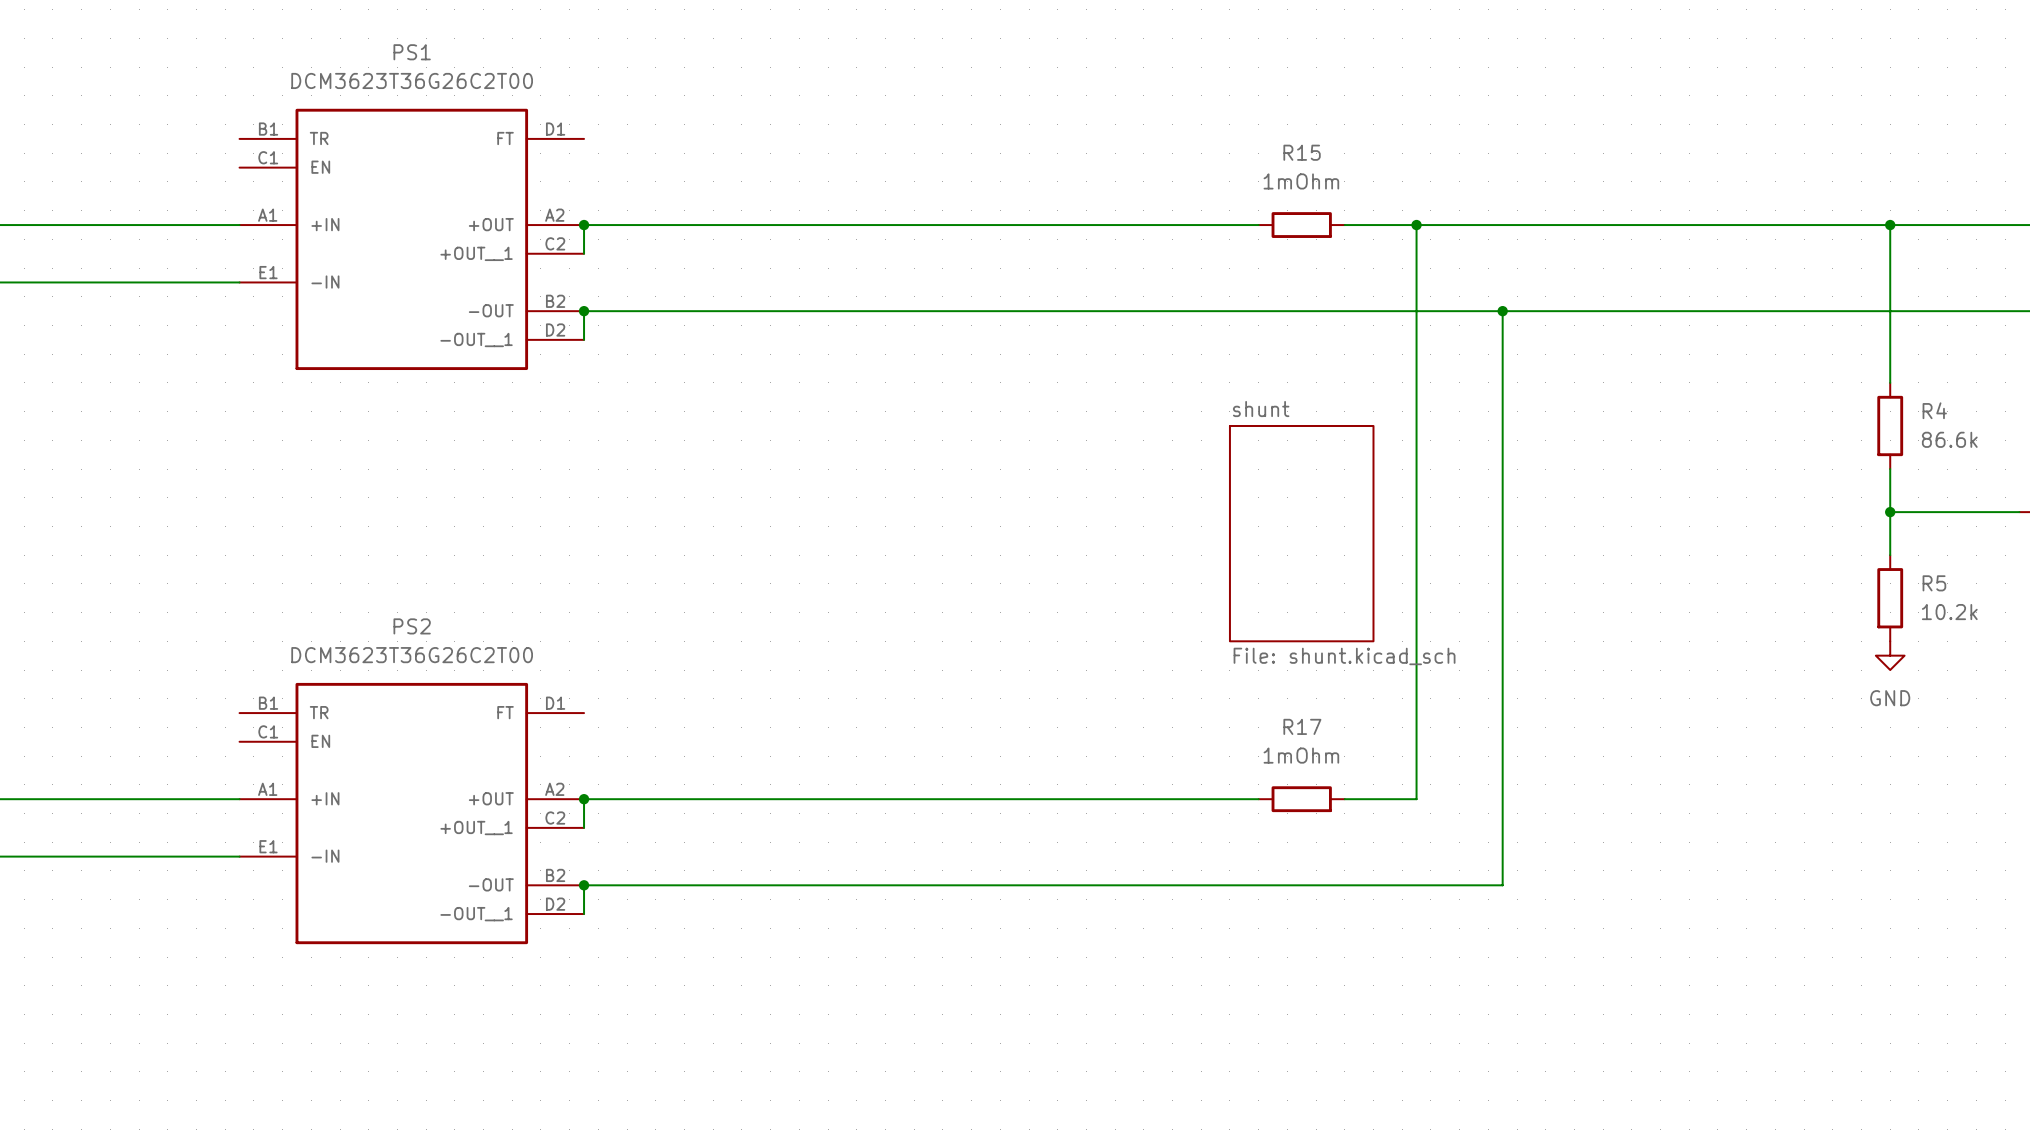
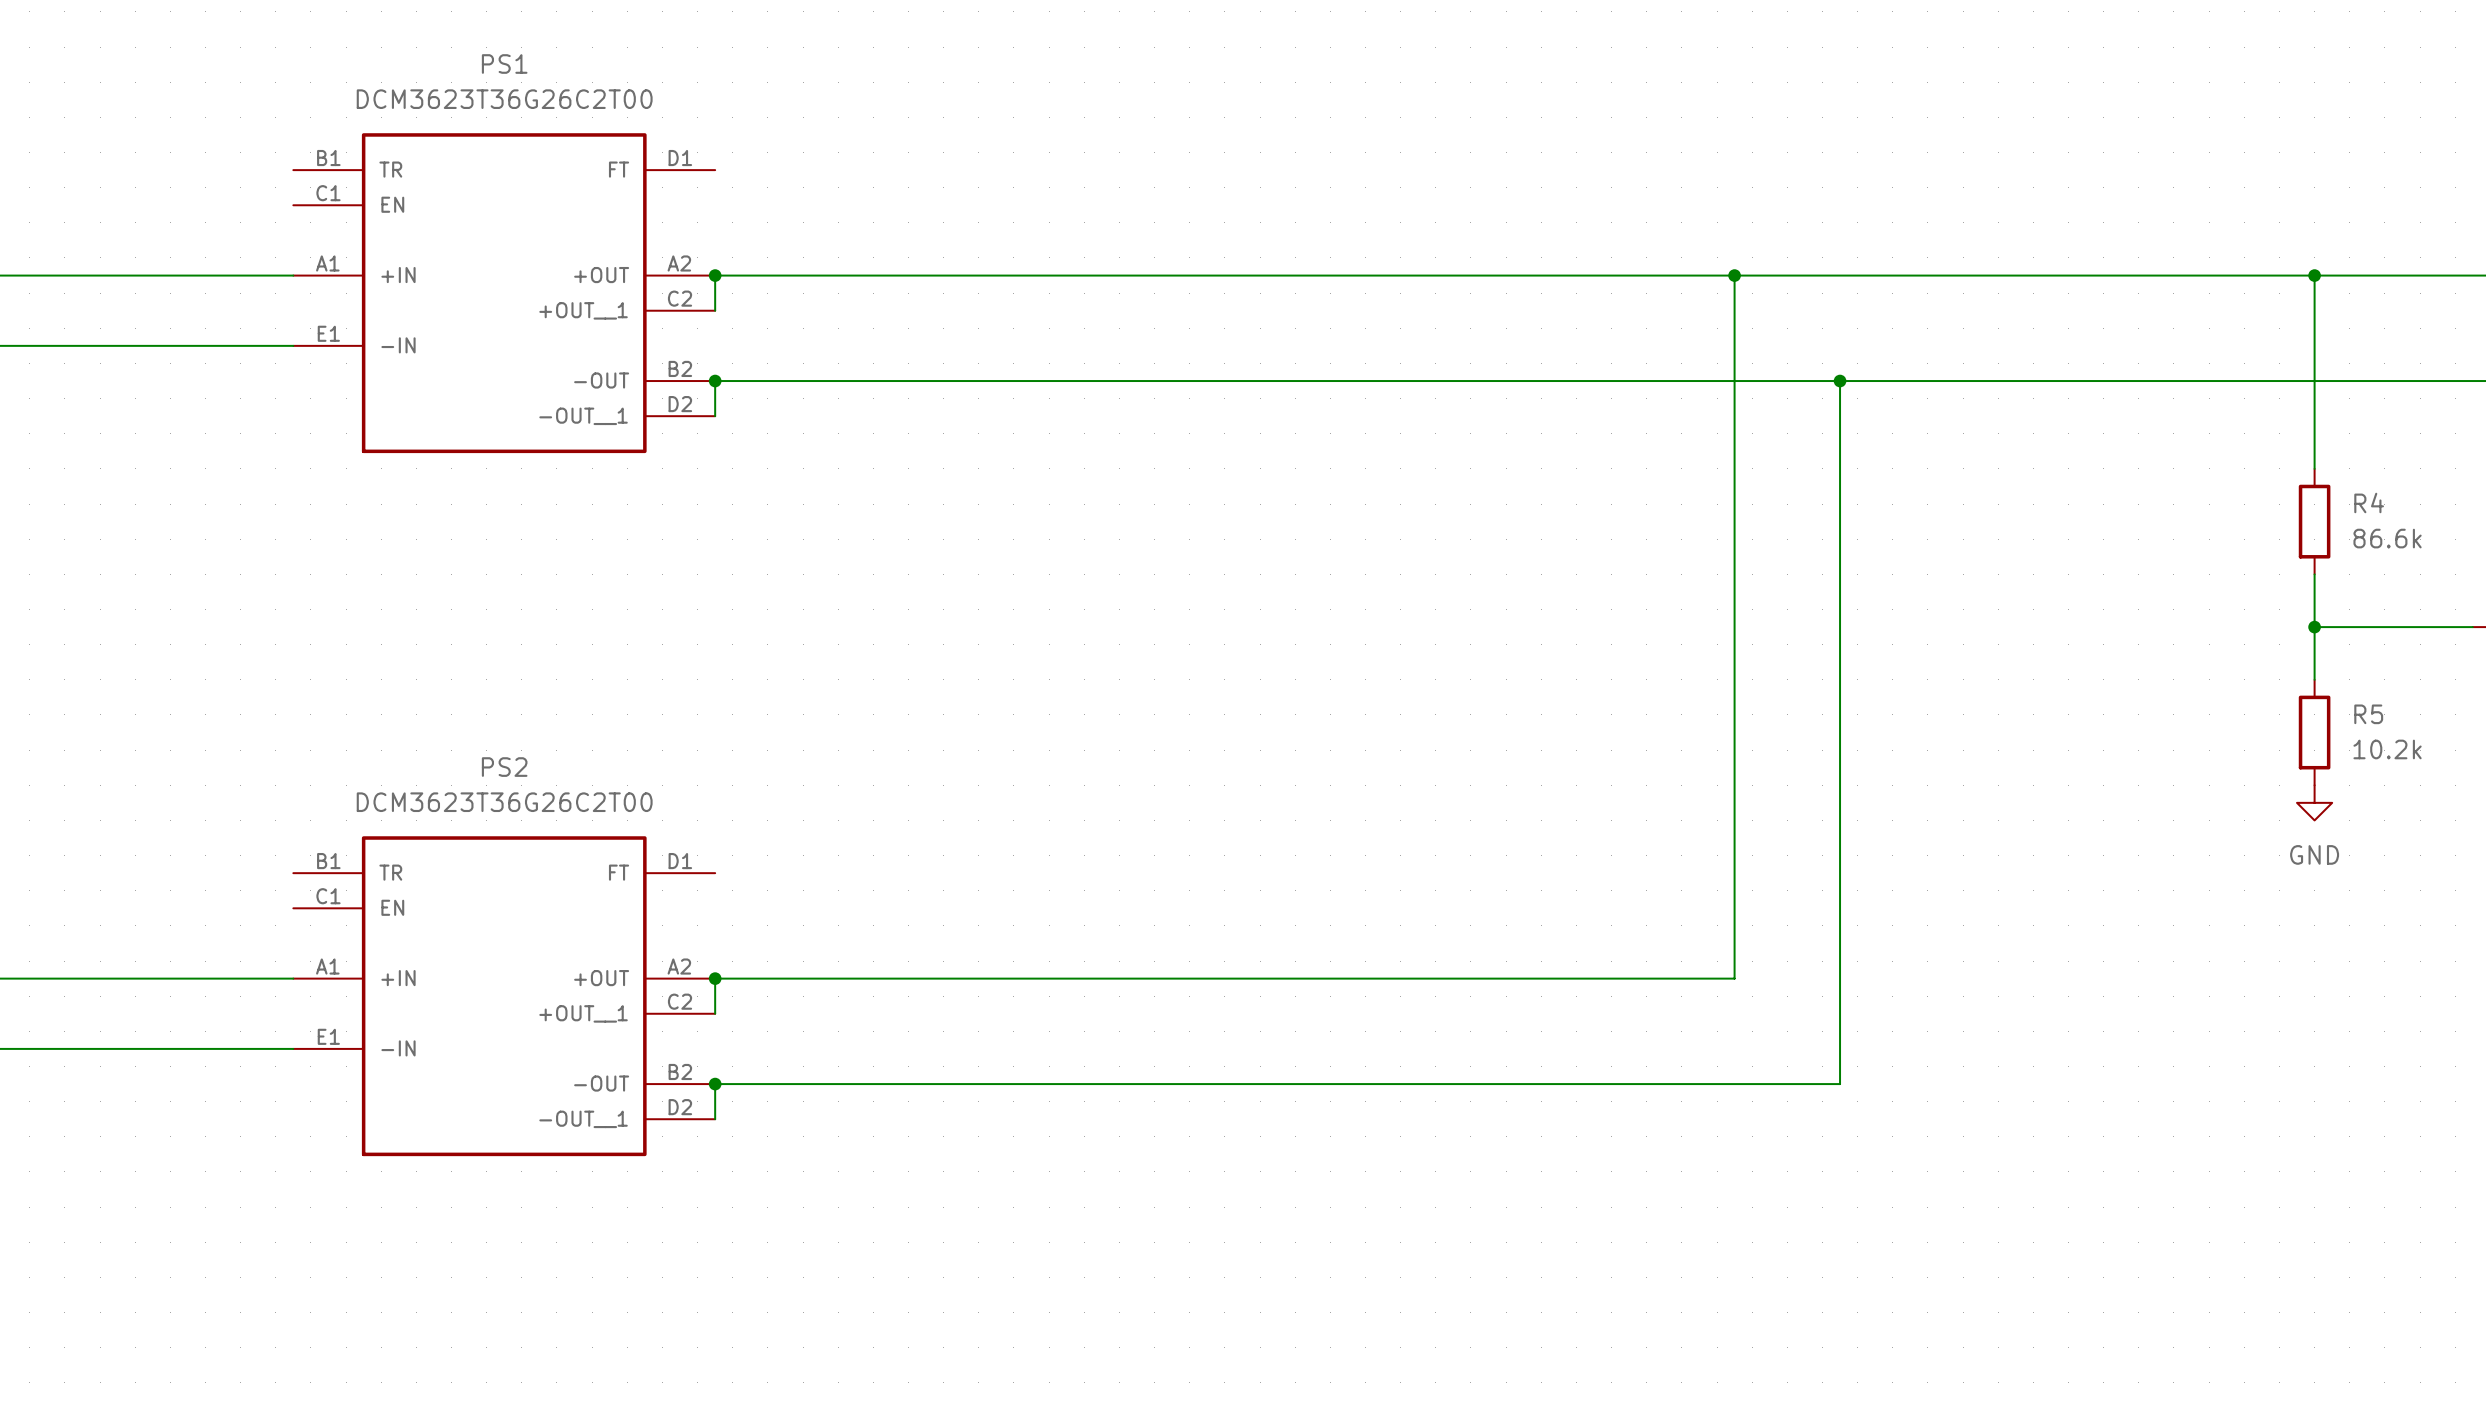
wire: none -> (1541, 275) (1646, 275)
R15: 1mOhm (1301, 225) -> none
sheet shunt: File: shunt.kicad_sch (1301, 533) -> none
wire: none -> (1541, 978) (1646, 978)
R17: 1mOhm (1301, 799) -> none

